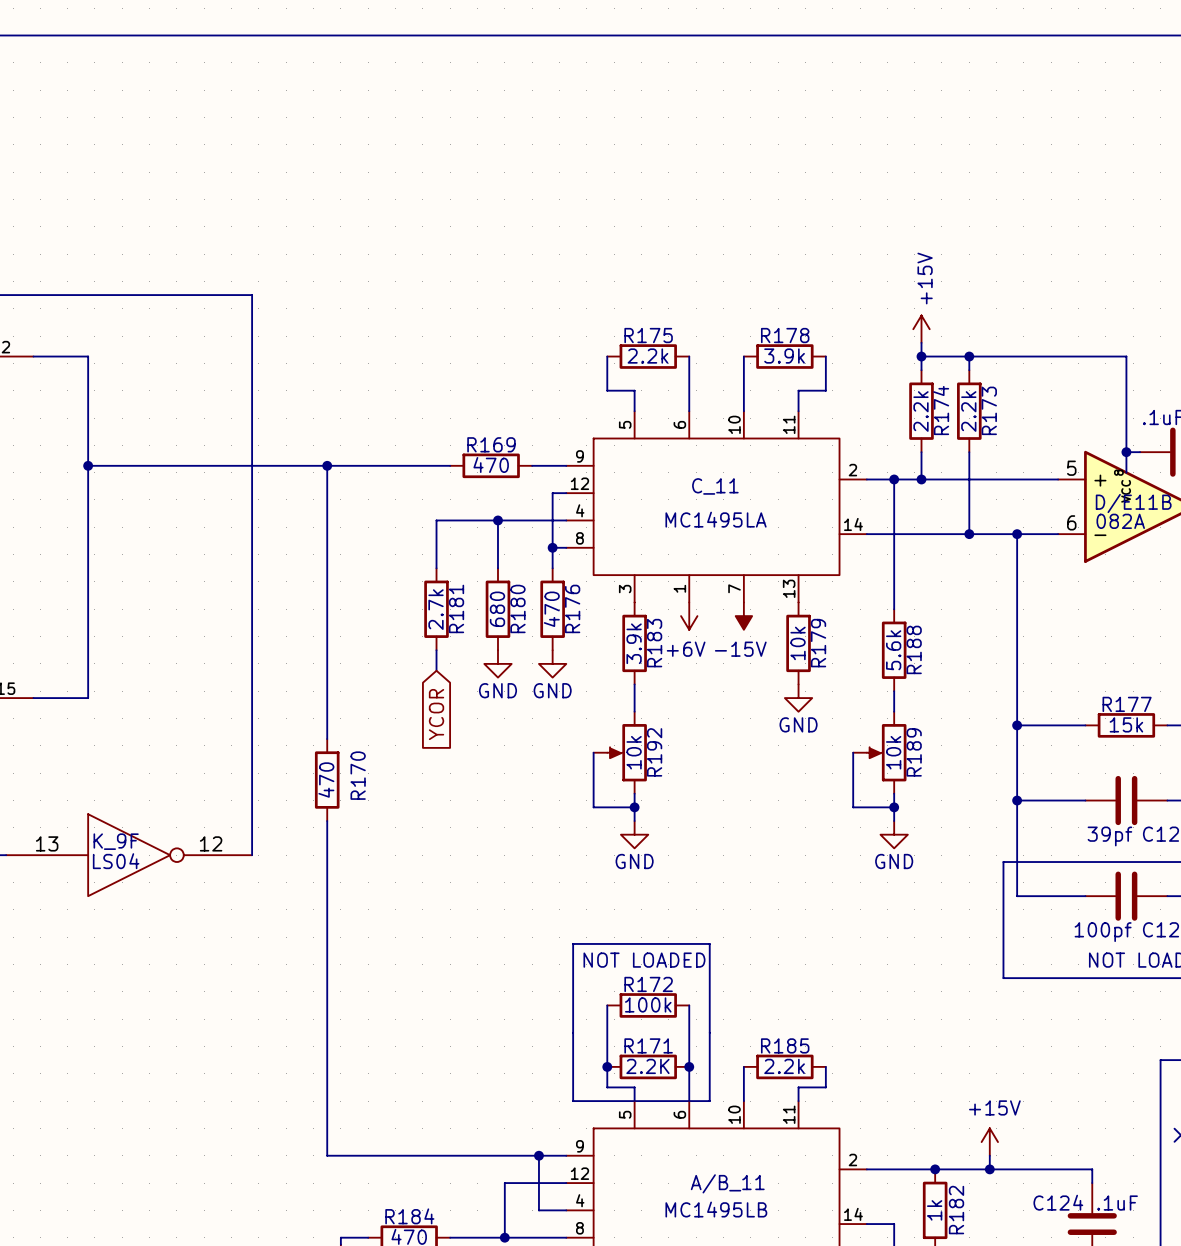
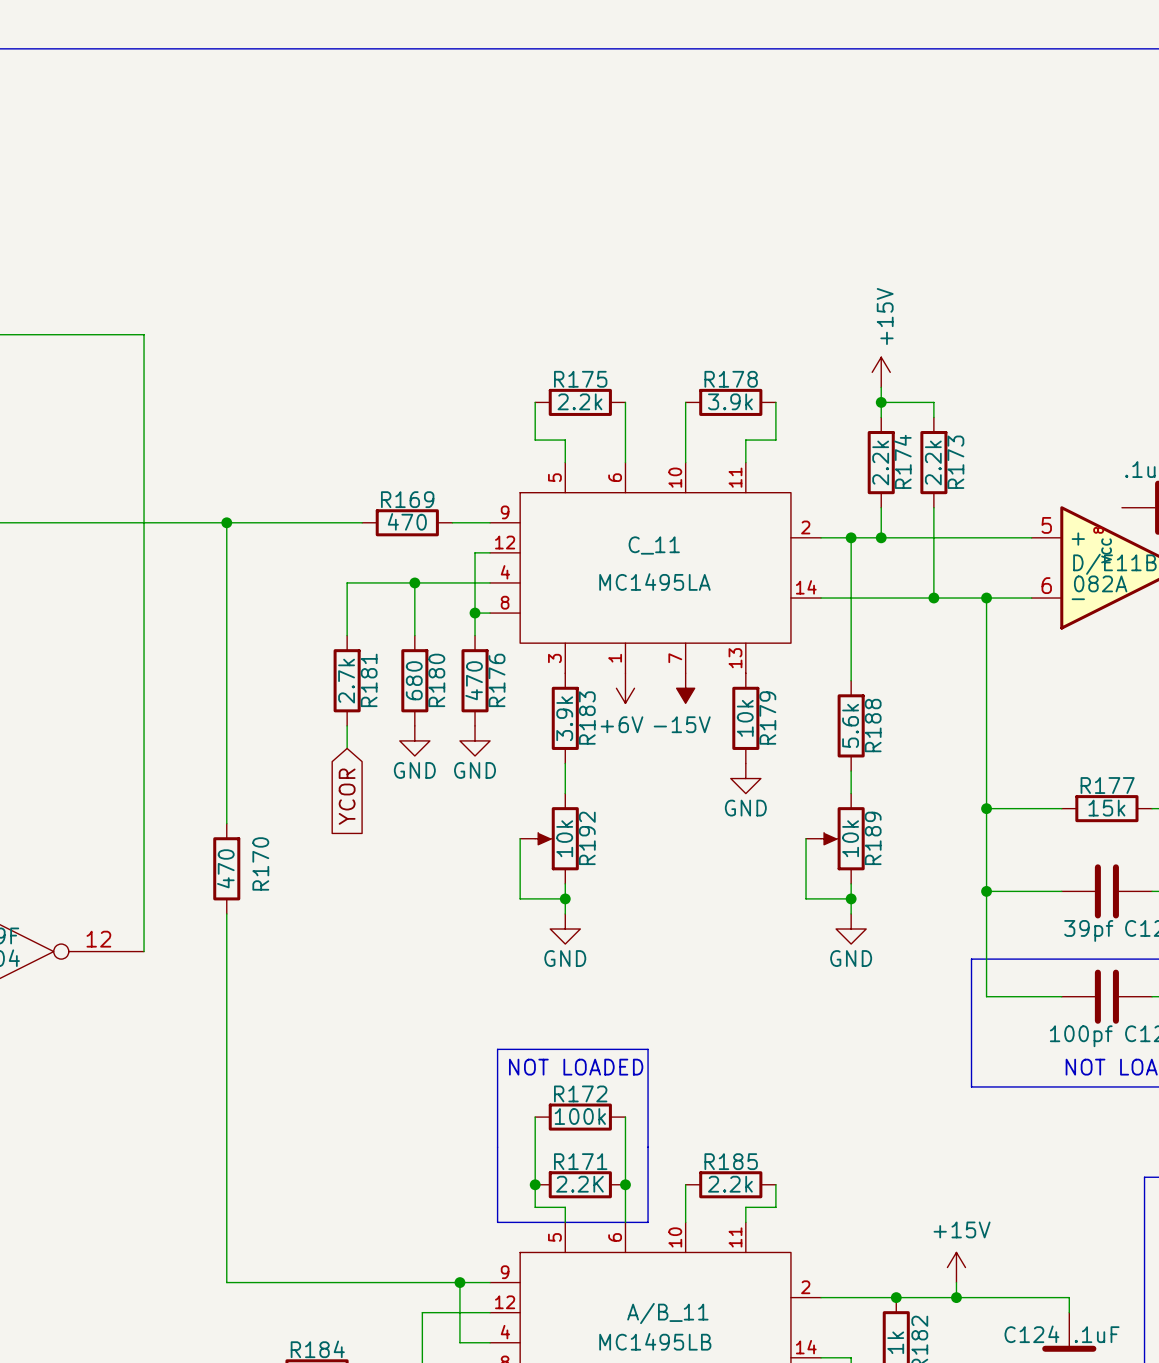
wire: (969, 356) (1126, 356) (1126, 472) -> none
junction: (969, 356) -> none
wire: (1126, 452) (1140, 452) -> none
junction: (1126, 452) -> none

